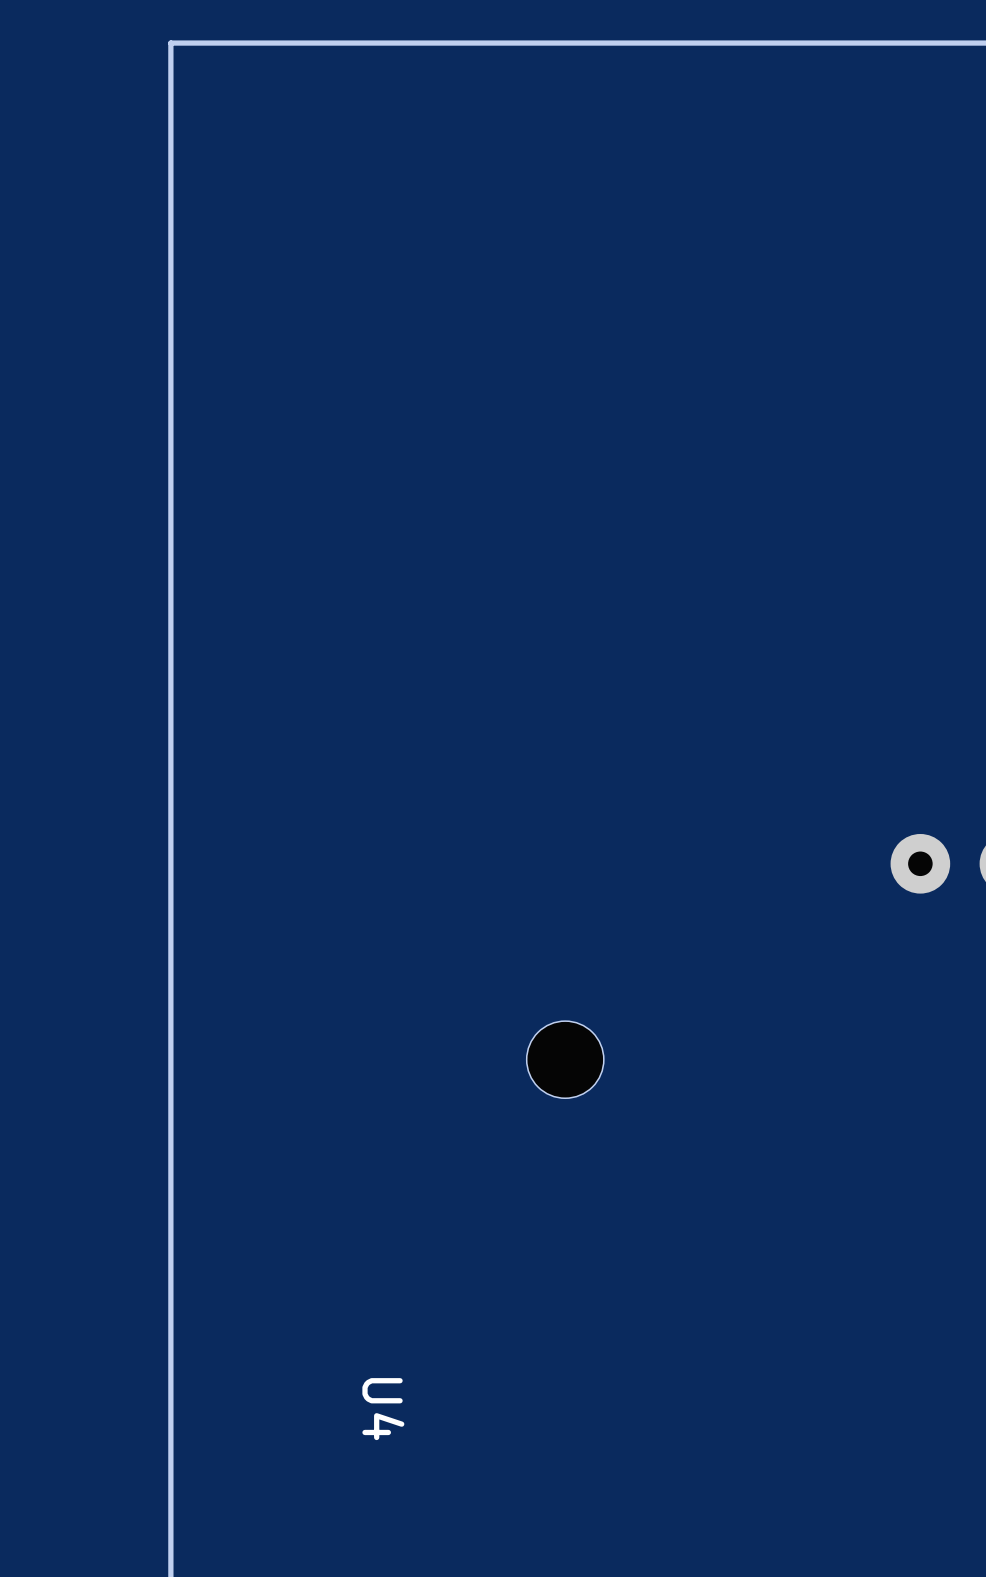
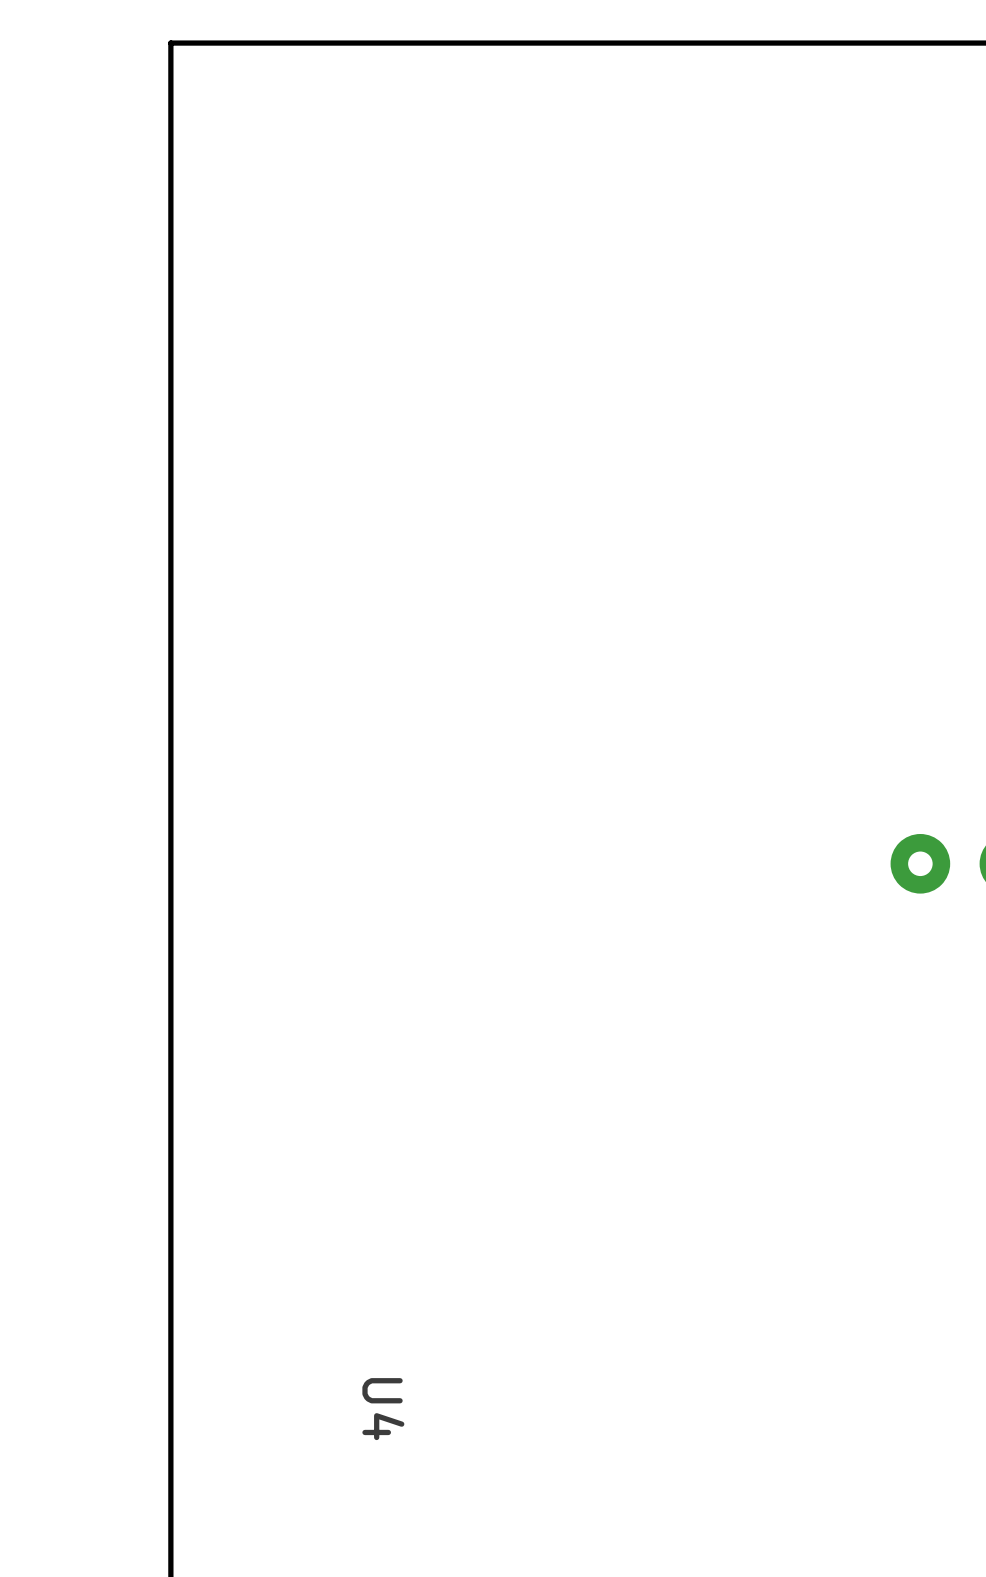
part: (565, 1059) -> none

